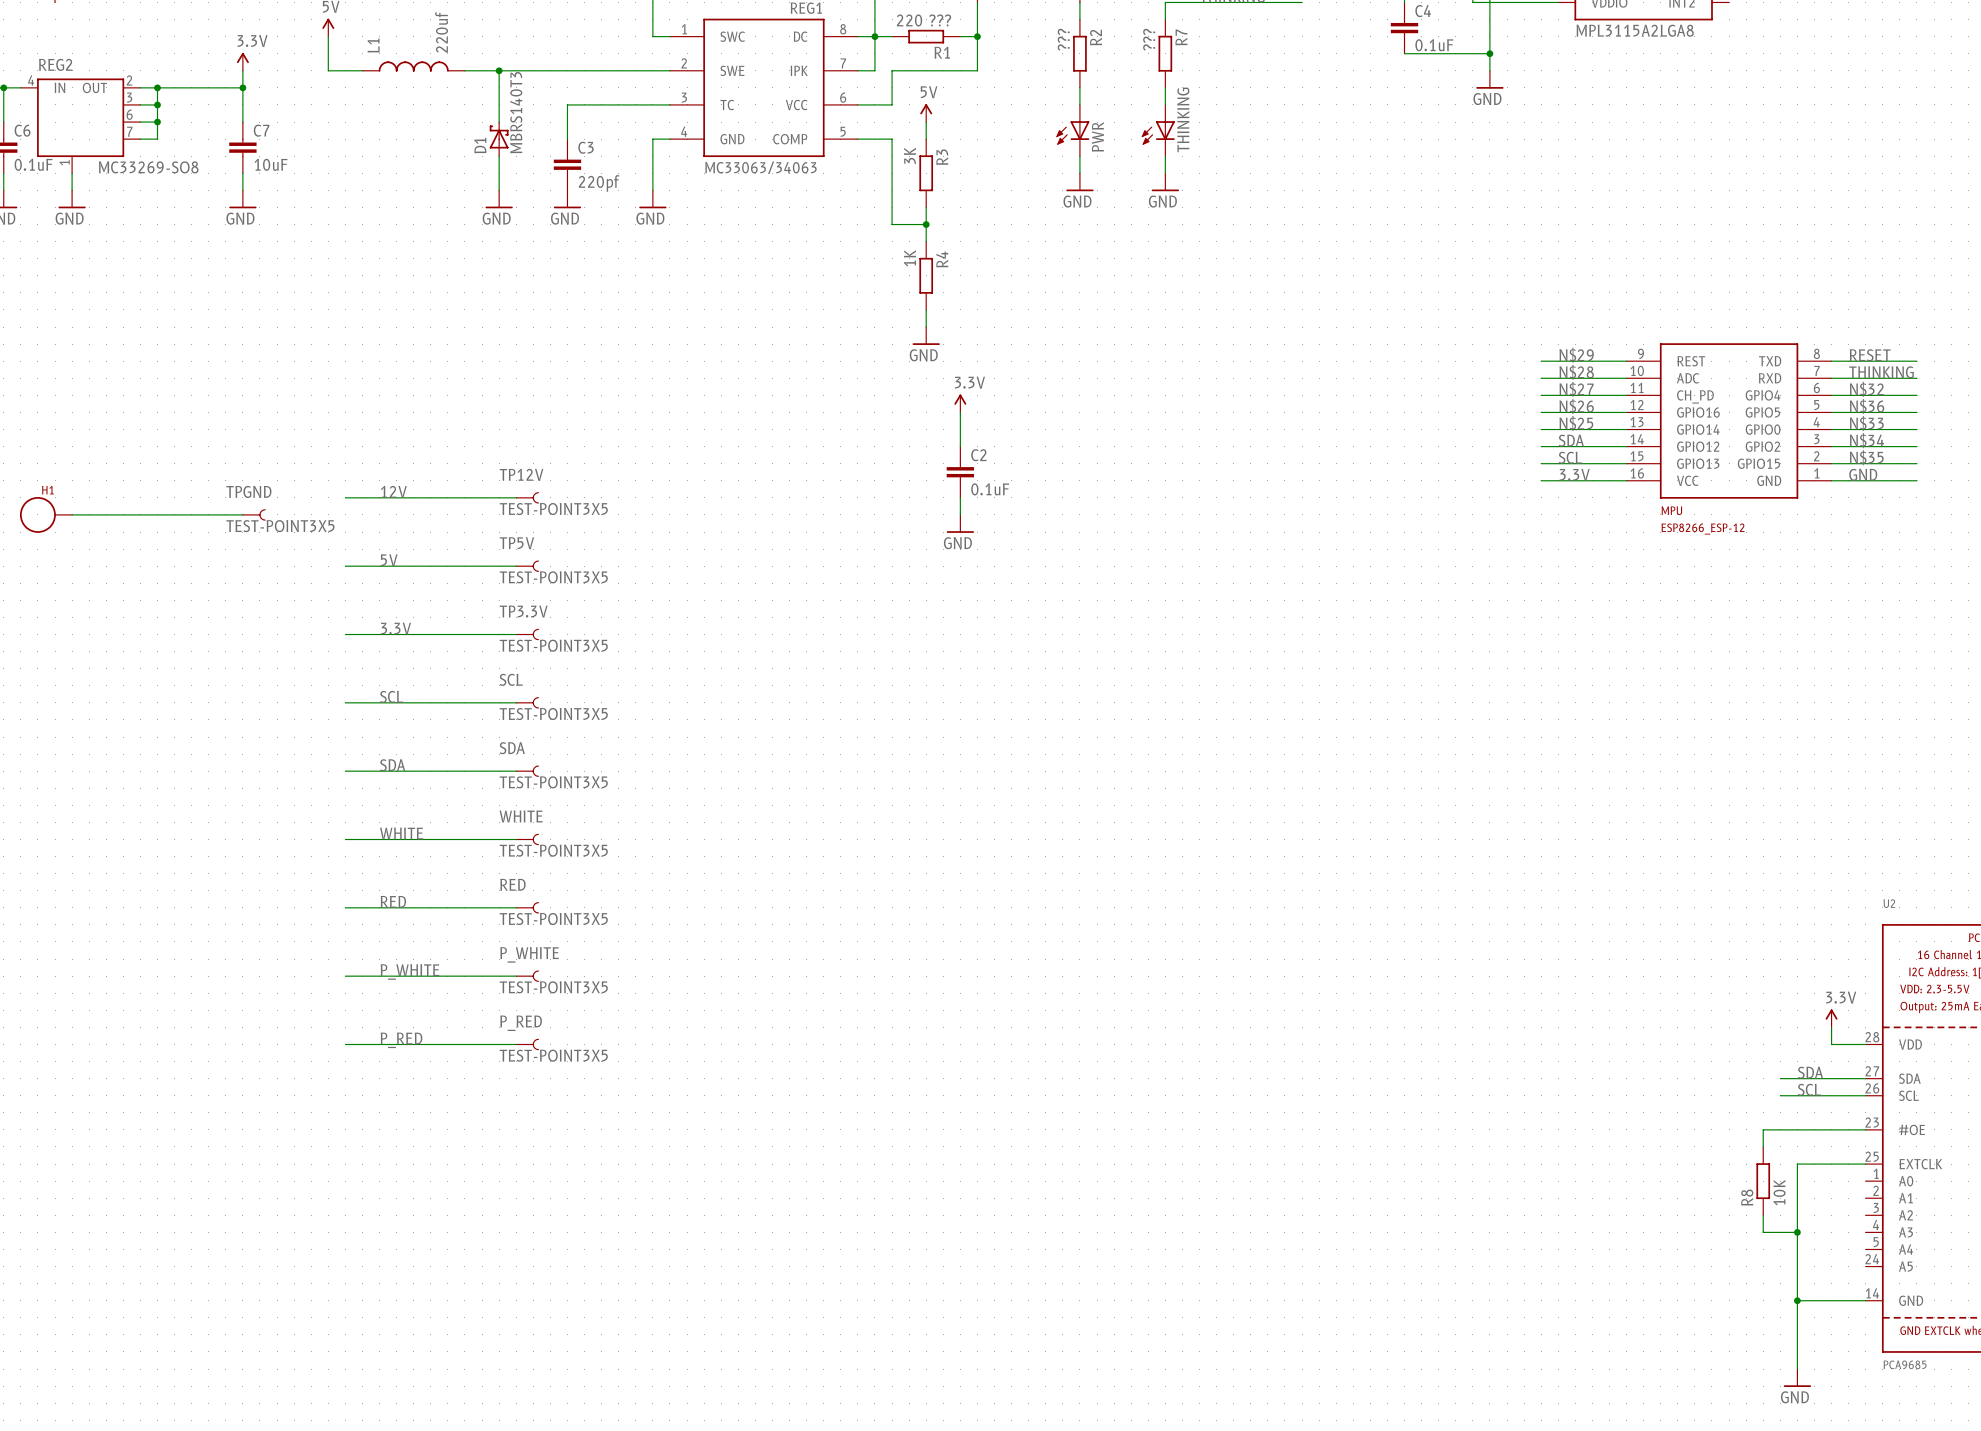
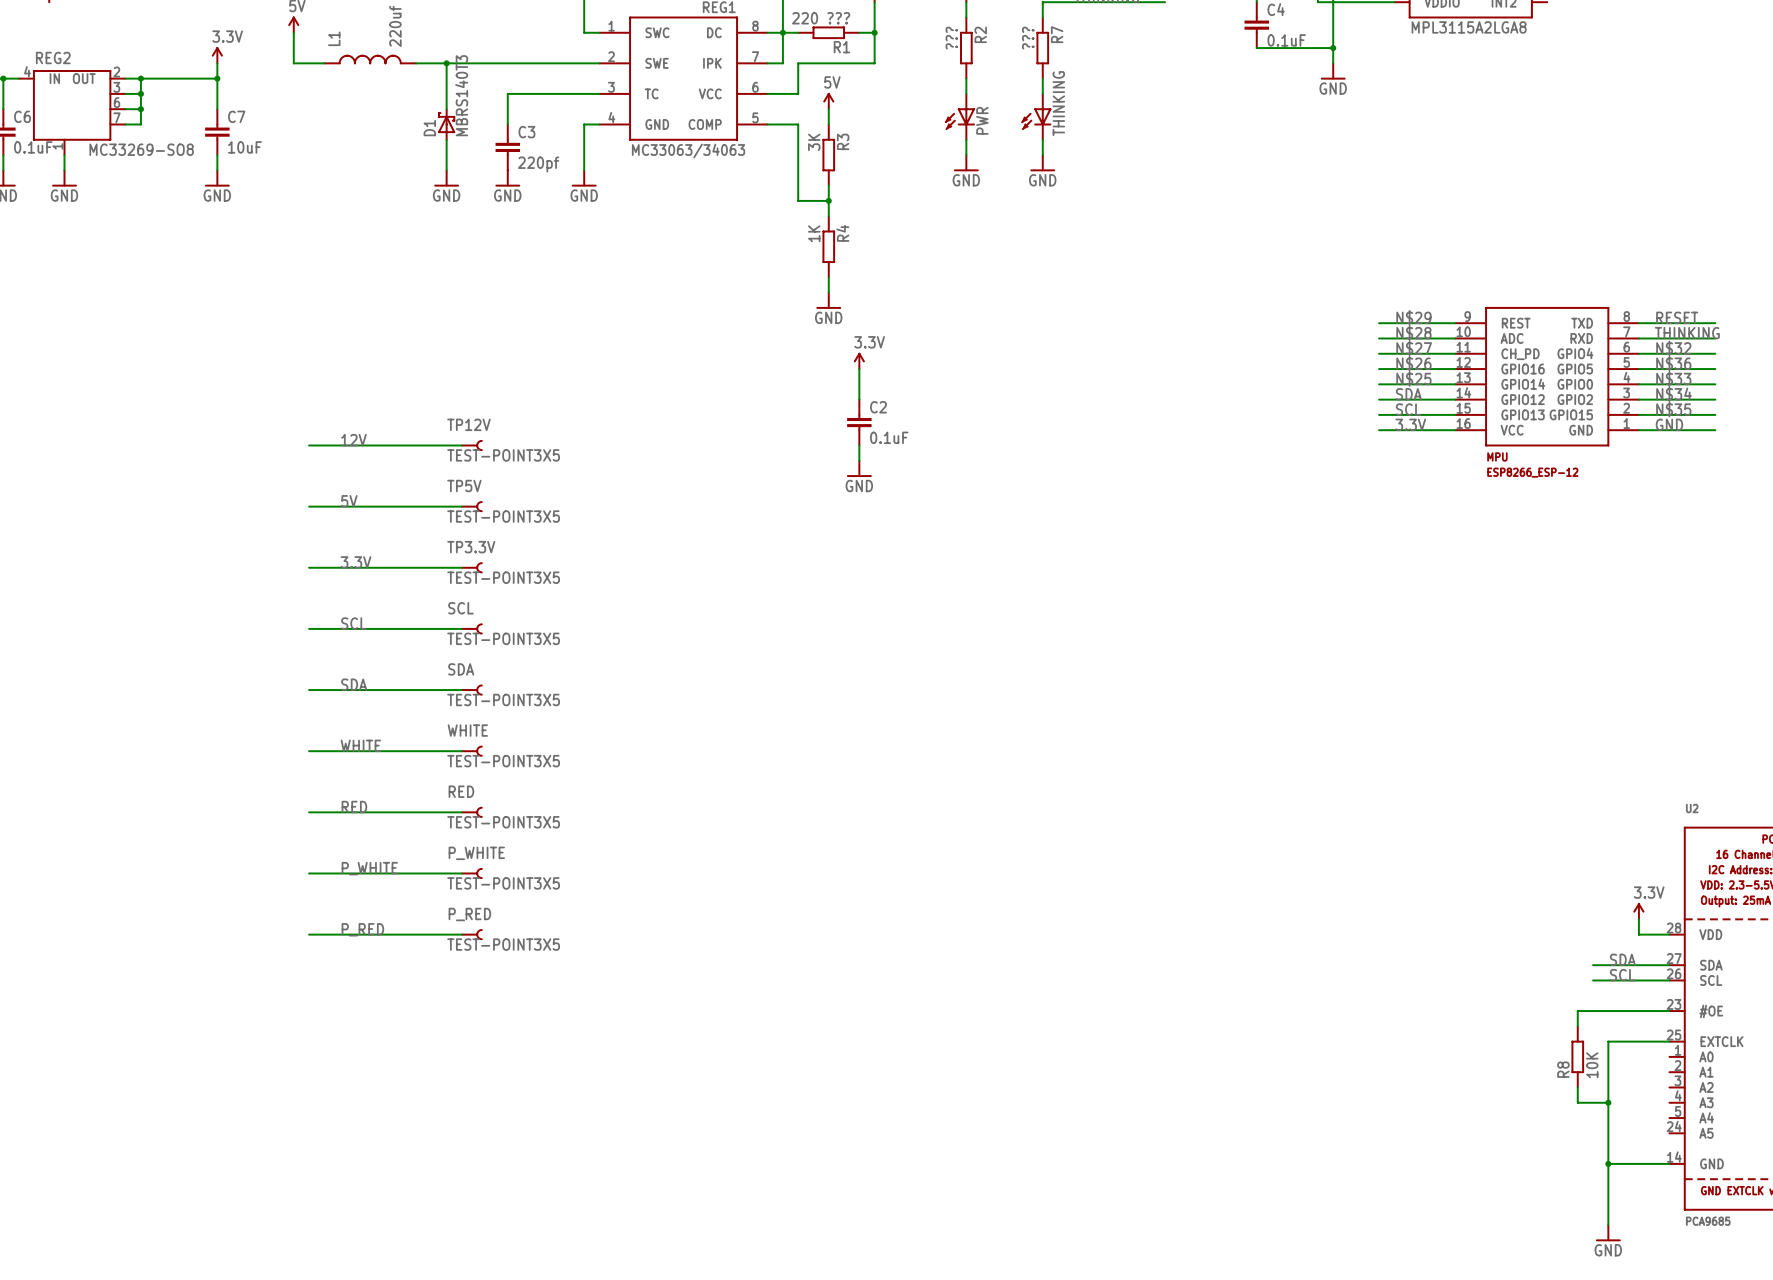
H1: (46, 514) -> none
wire: (72, 514) (242, 514) -> none
TPGND: TEST-POINT3X5 (254, 514) -> none

